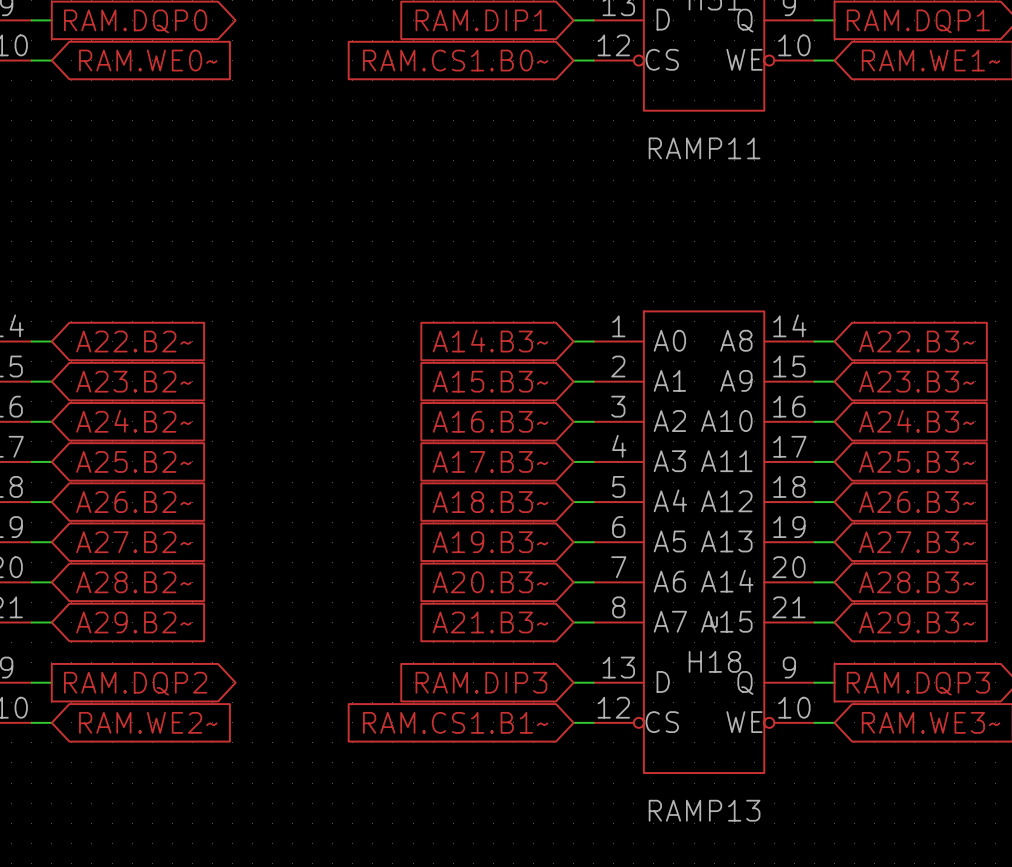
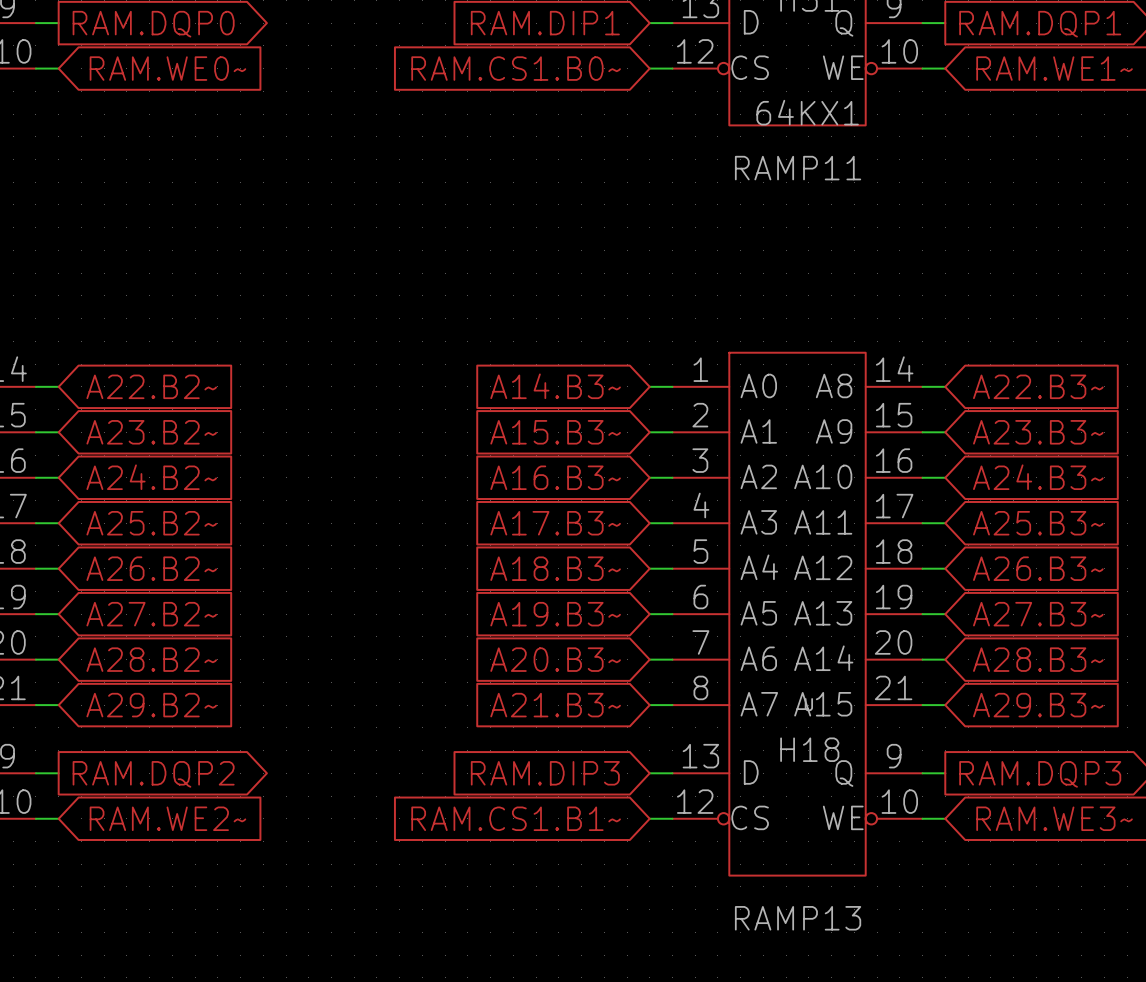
part value: none -> 64KX1 (807, 112)

